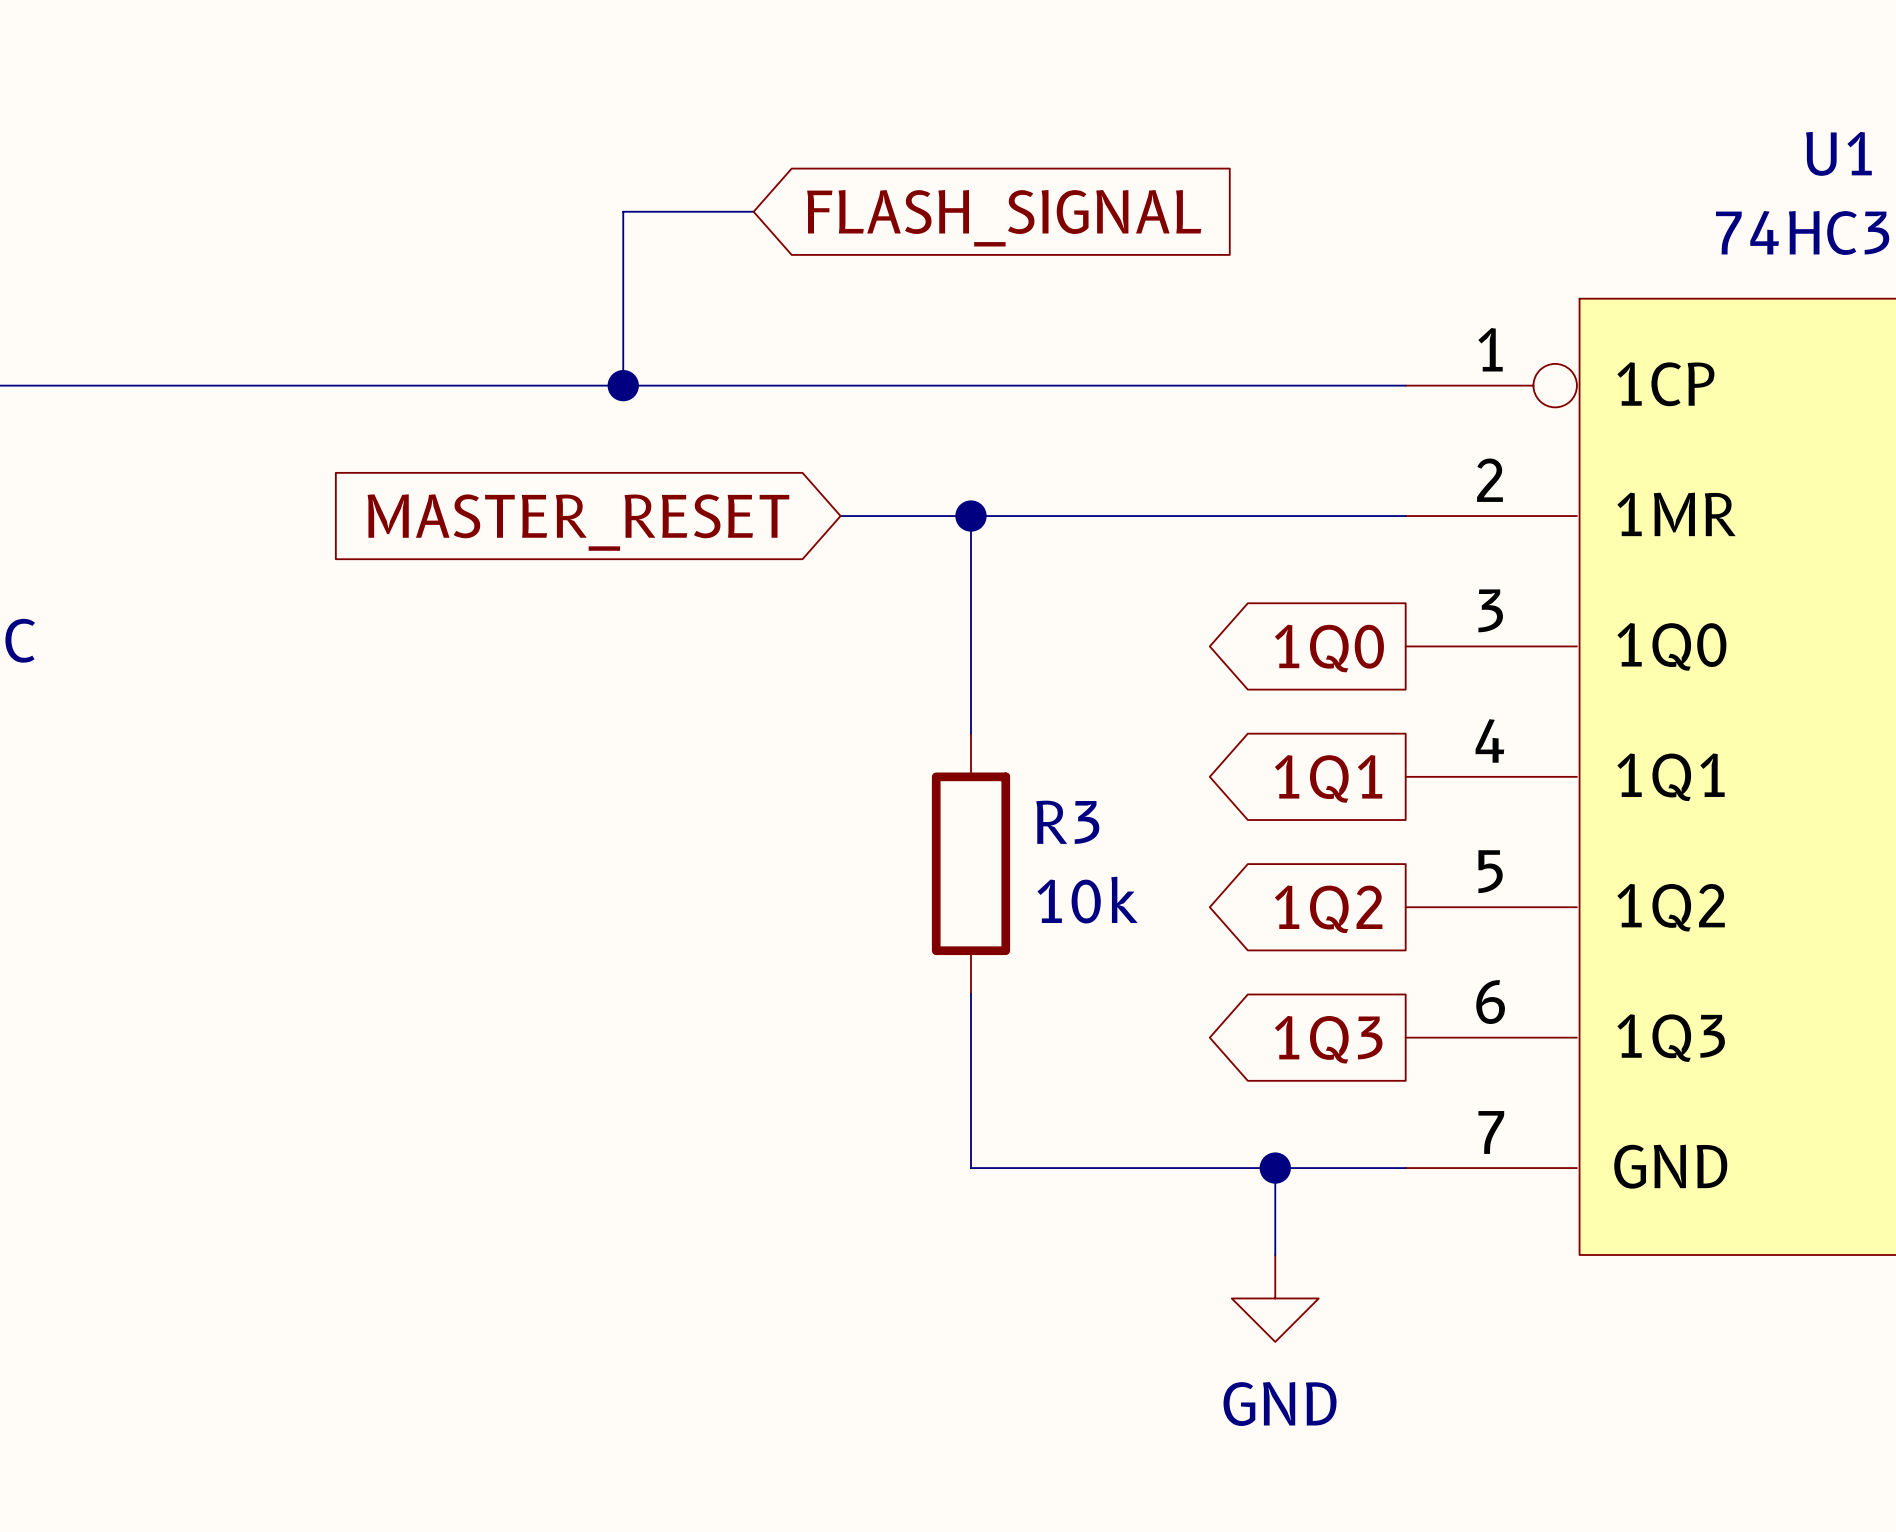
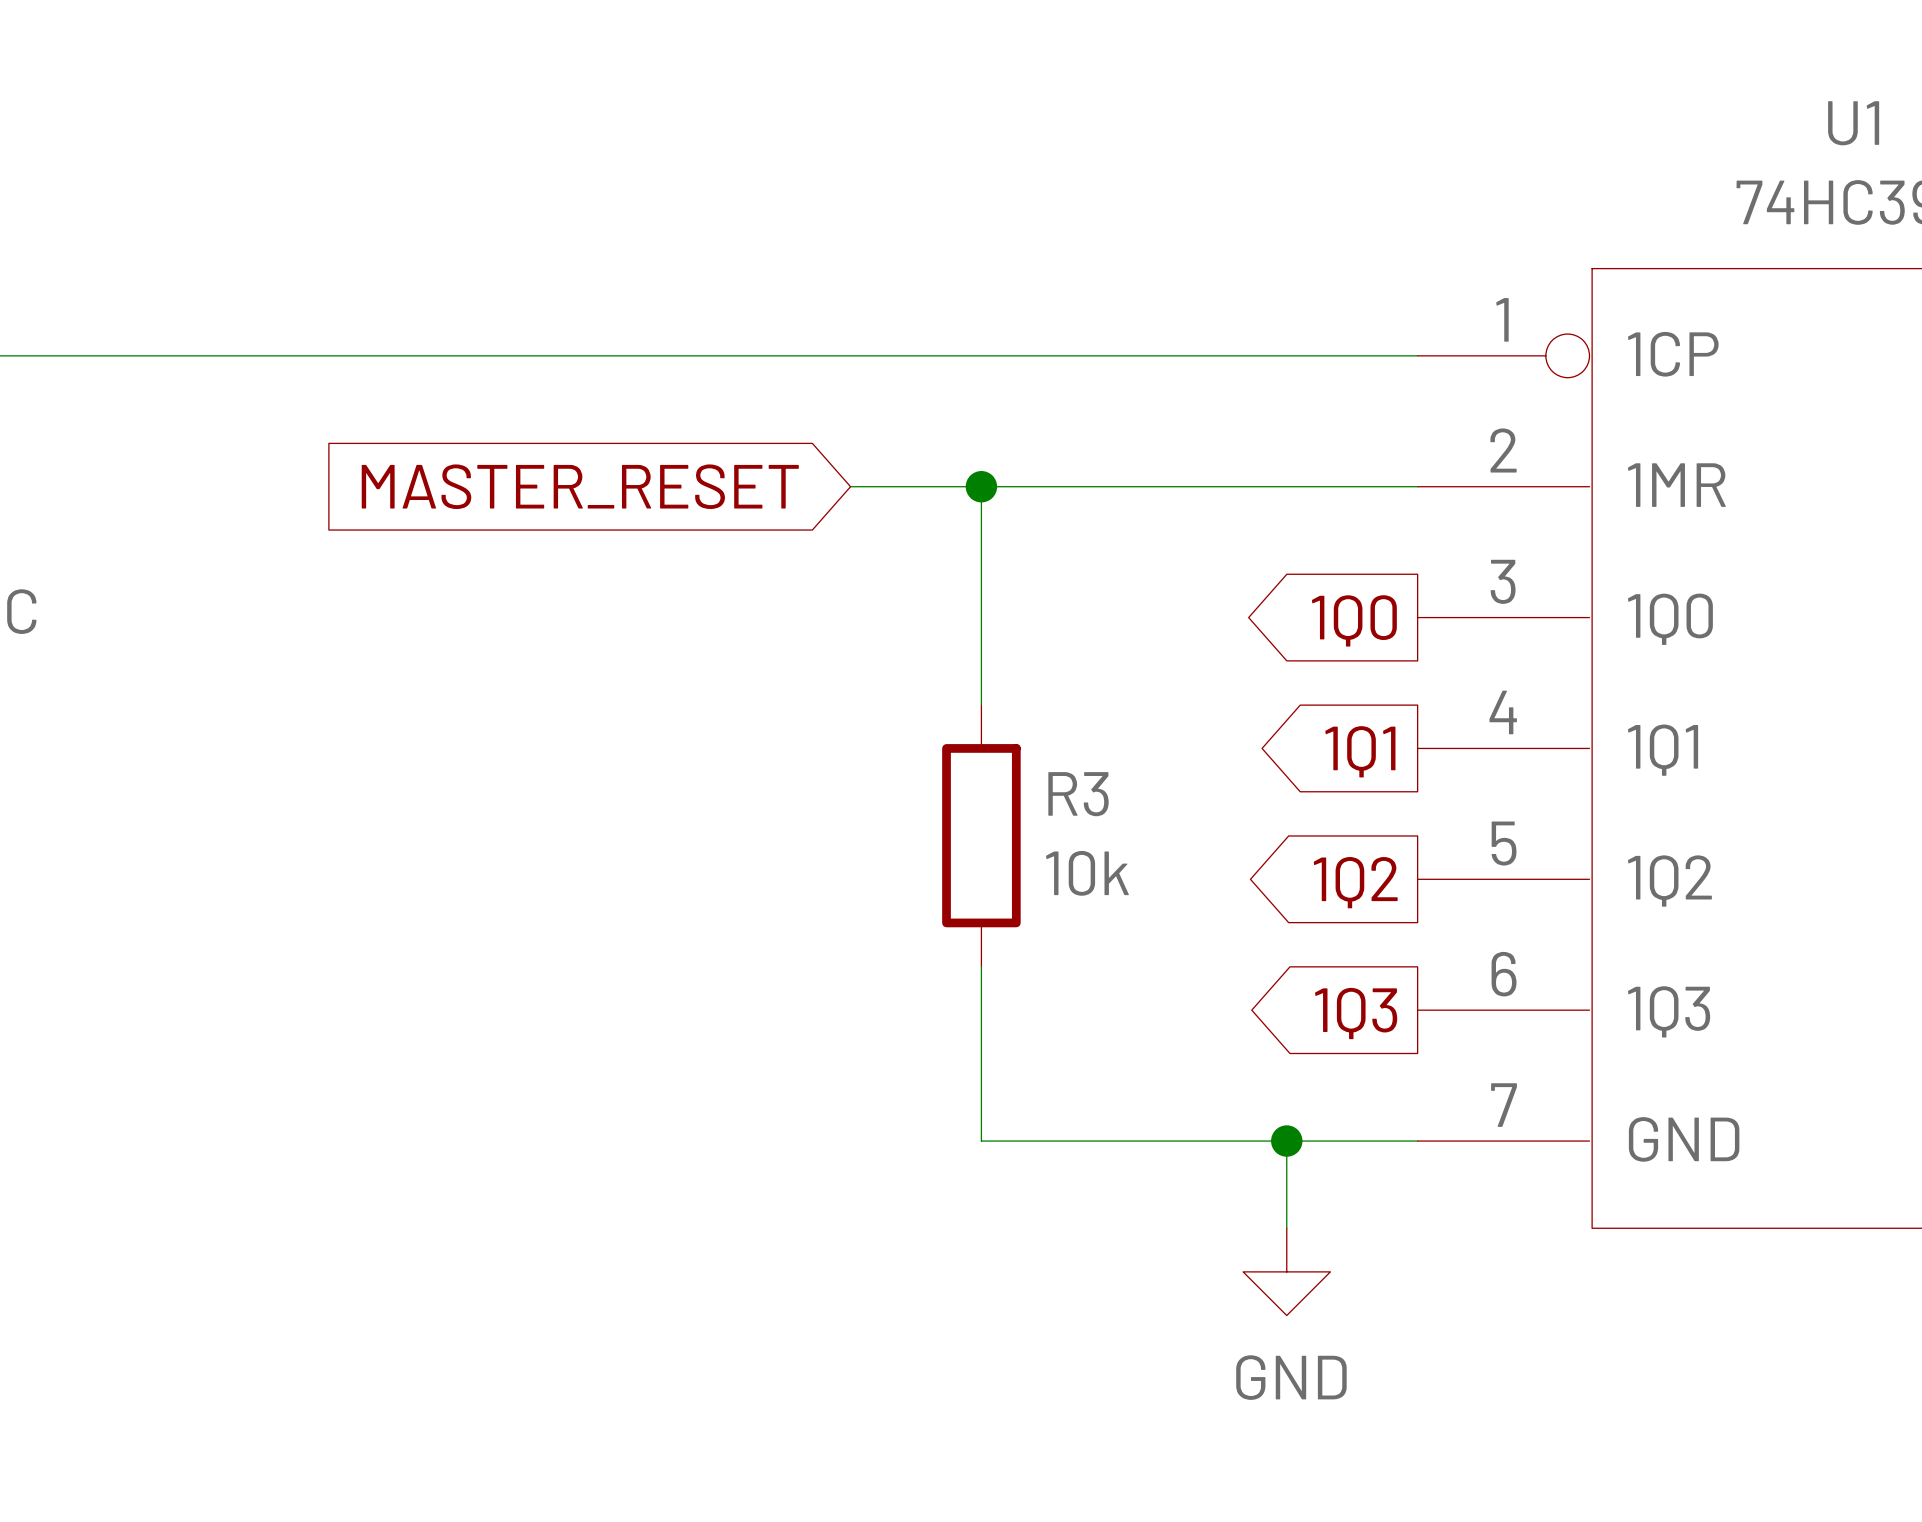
wire: (753, 211) (623, 211) (623, 385) -> none
global label: FLASH_SIGNAL (1004, 218) -> none
junction: (623, 385) -> none

